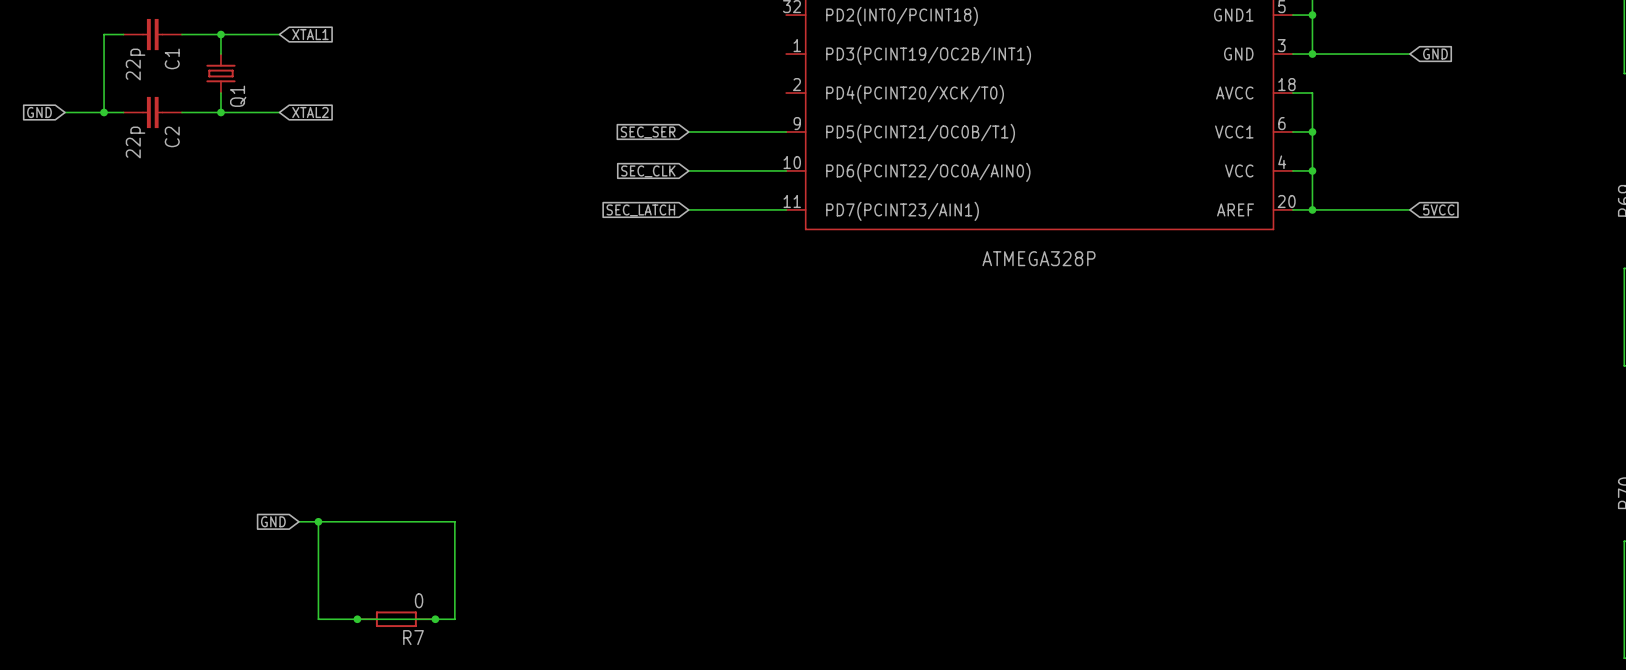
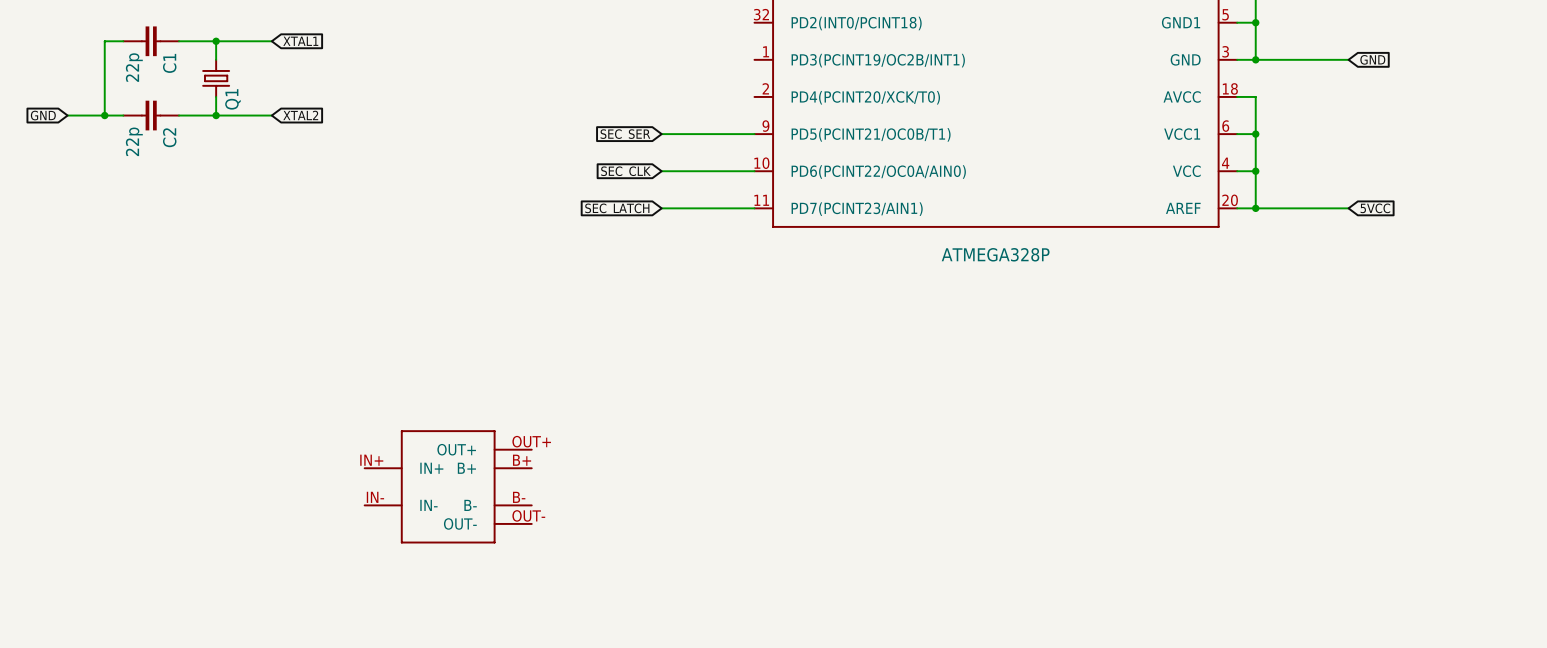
part: none -> (448, 486)
global label: GND (273, 521) -> none
wire: (298, 521) (454, 521) (454, 619) (318, 619) (318, 521) -> none
junction: (318, 521) -> none
junction: (357, 619) -> none
R7: 0 (396, 619) -> none
junction: (435, 619) -> none

